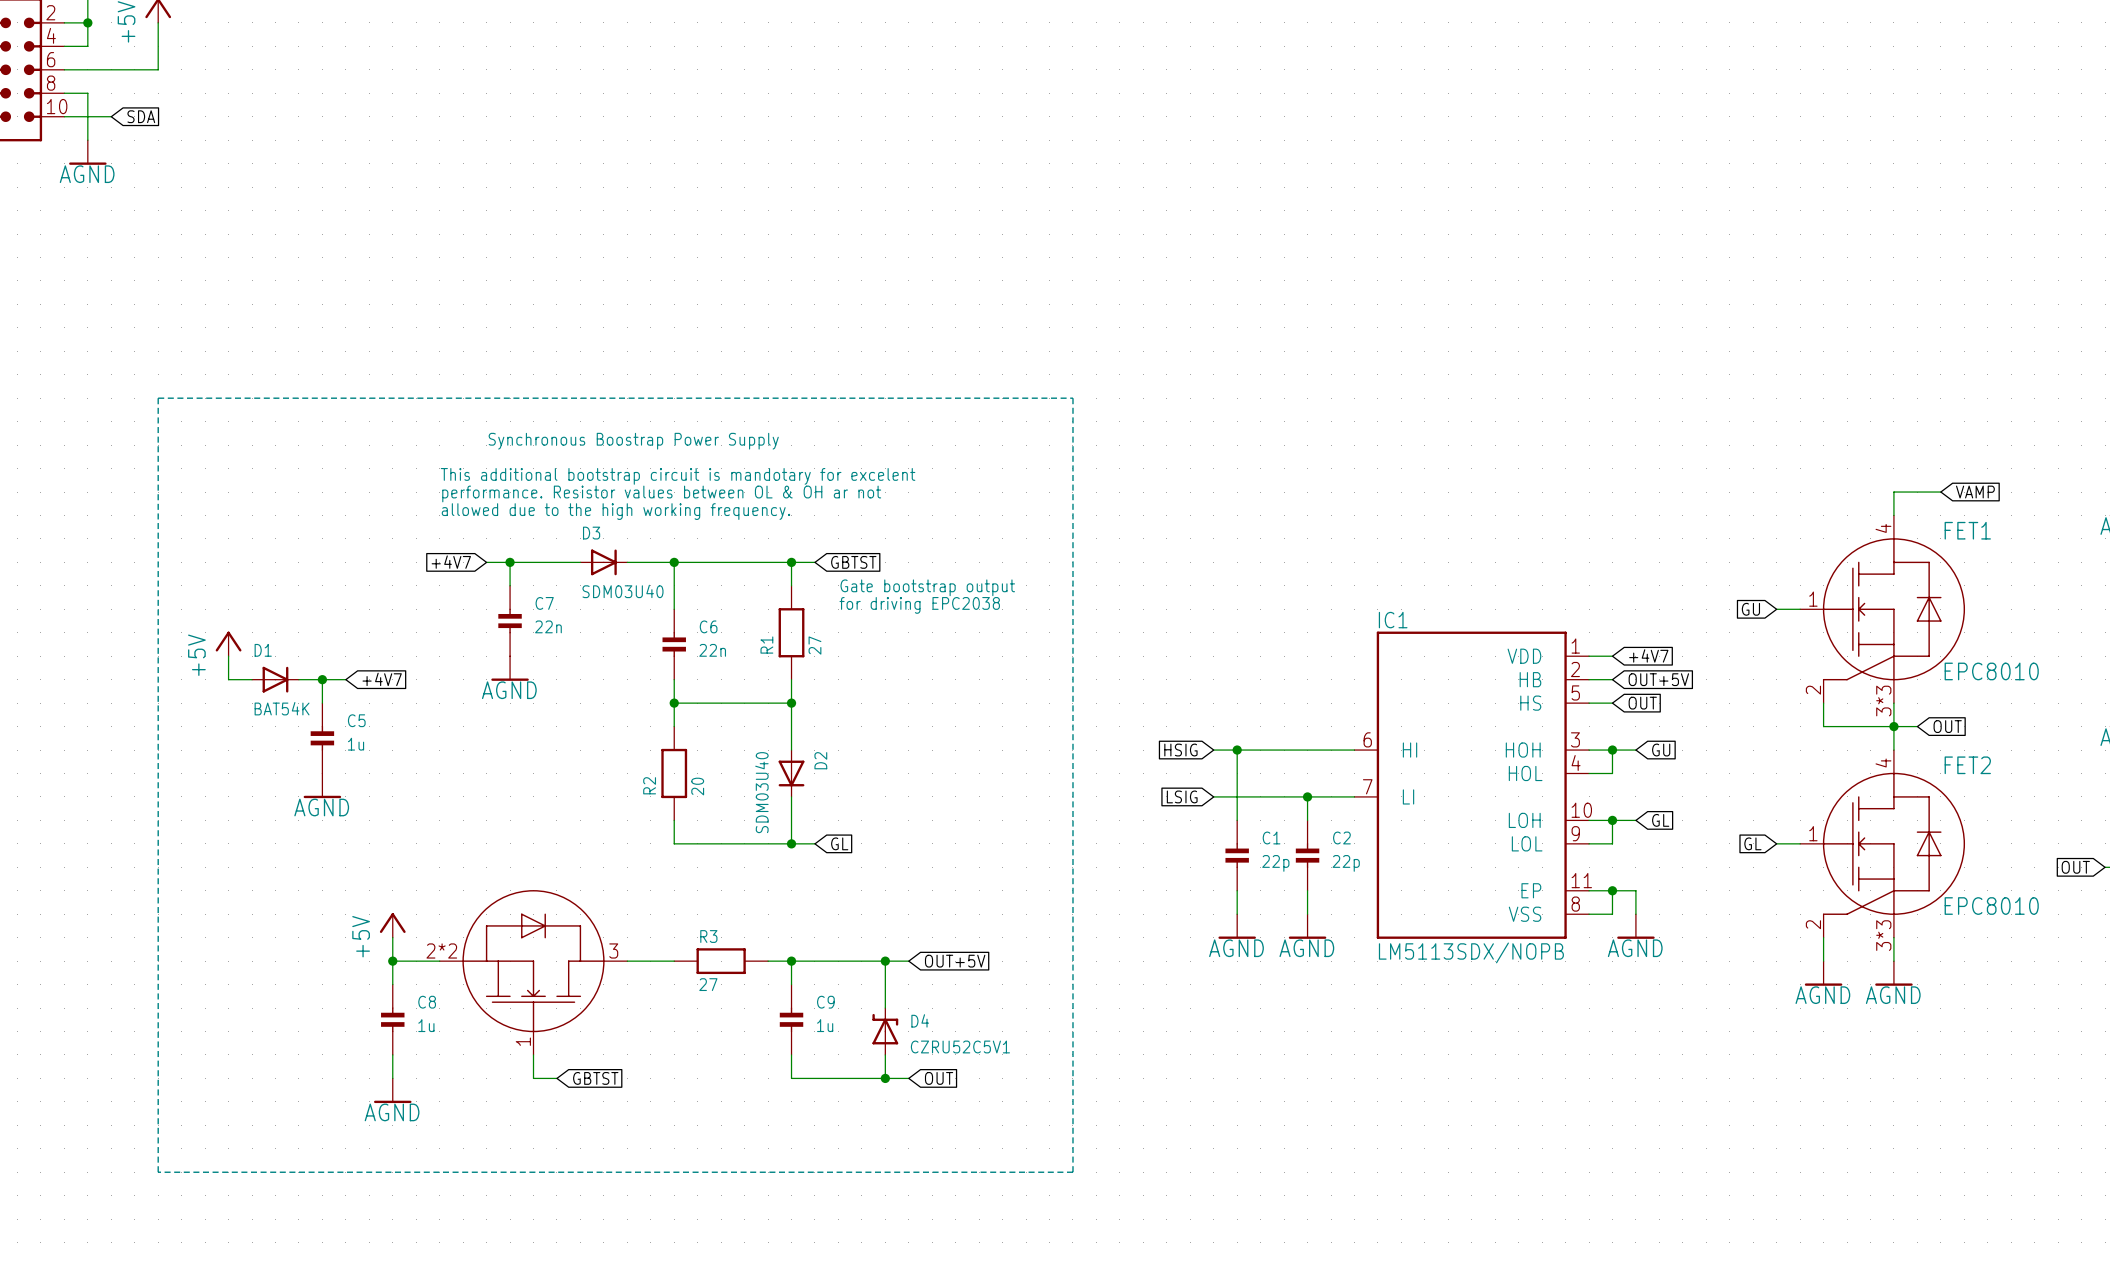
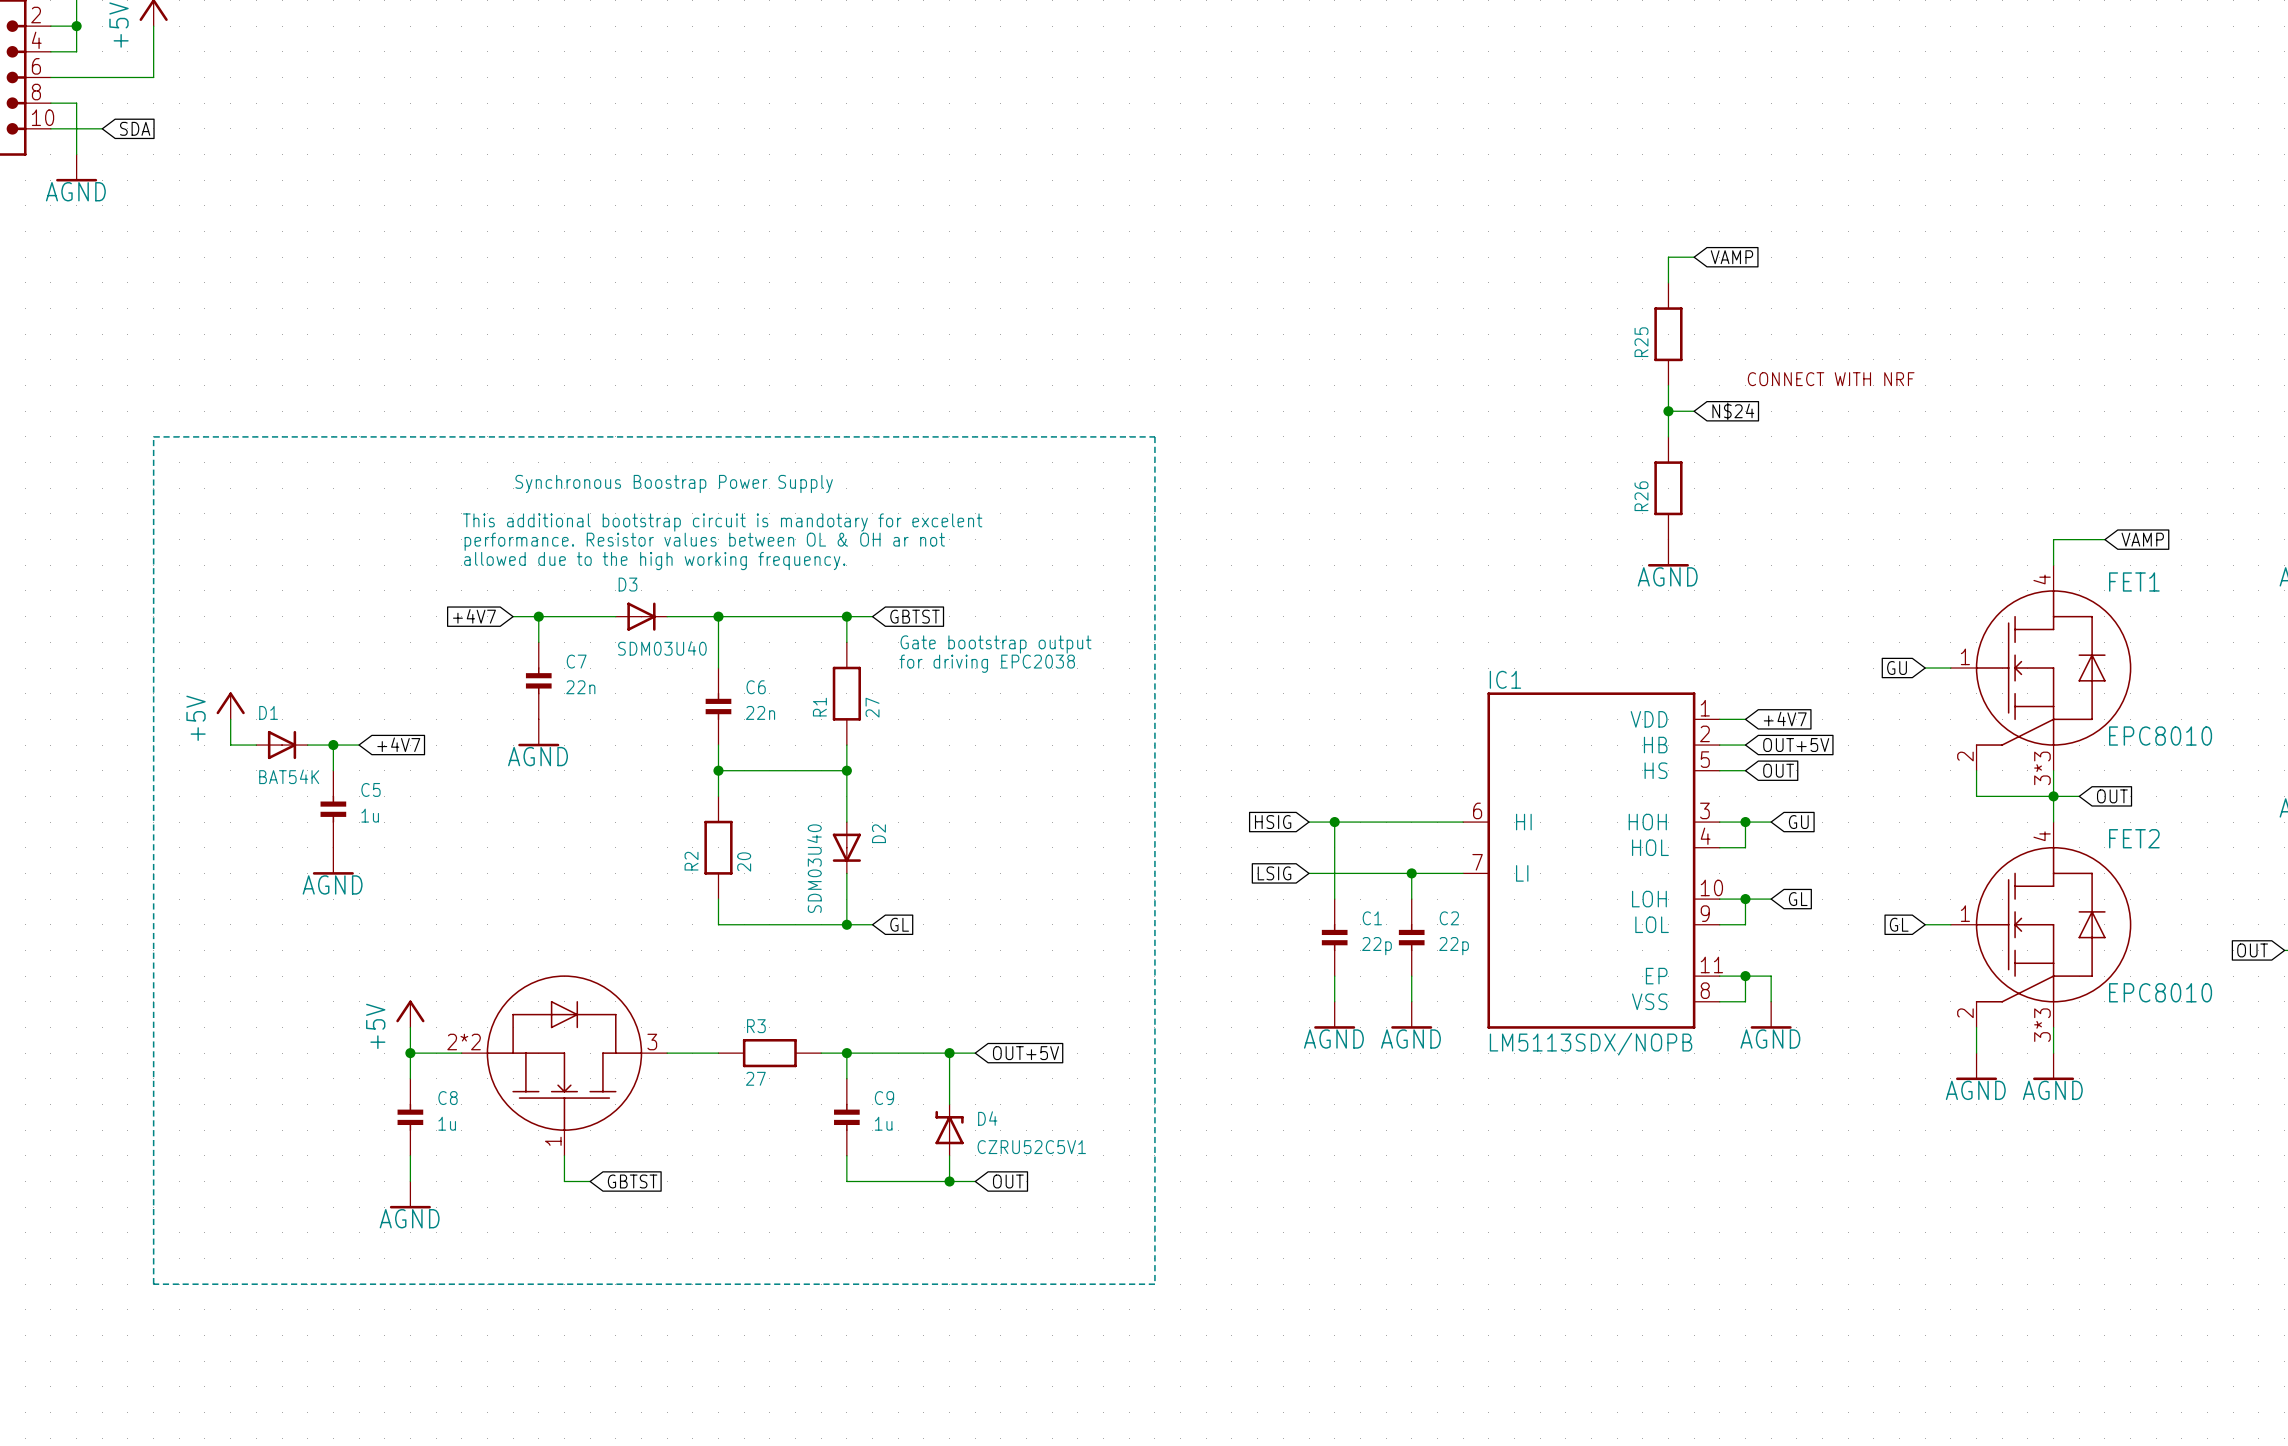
wire: none -> (1694, 257) (1668, 257) (1668, 282)
global label: none -> VAMP (1731, 257)
R25: none -> (1668, 334)
text: none -> CONNECT WITH NRF (1831, 379)
wire: none -> (1668, 385) (1668, 436)
wire: none -> (1668, 411) (1694, 411)
junction: none -> (1668, 411)
global label: none -> N$24 (1733, 411)
R26: none -> (1668, 488)
power symbol: none -> AGND (1668, 553)

